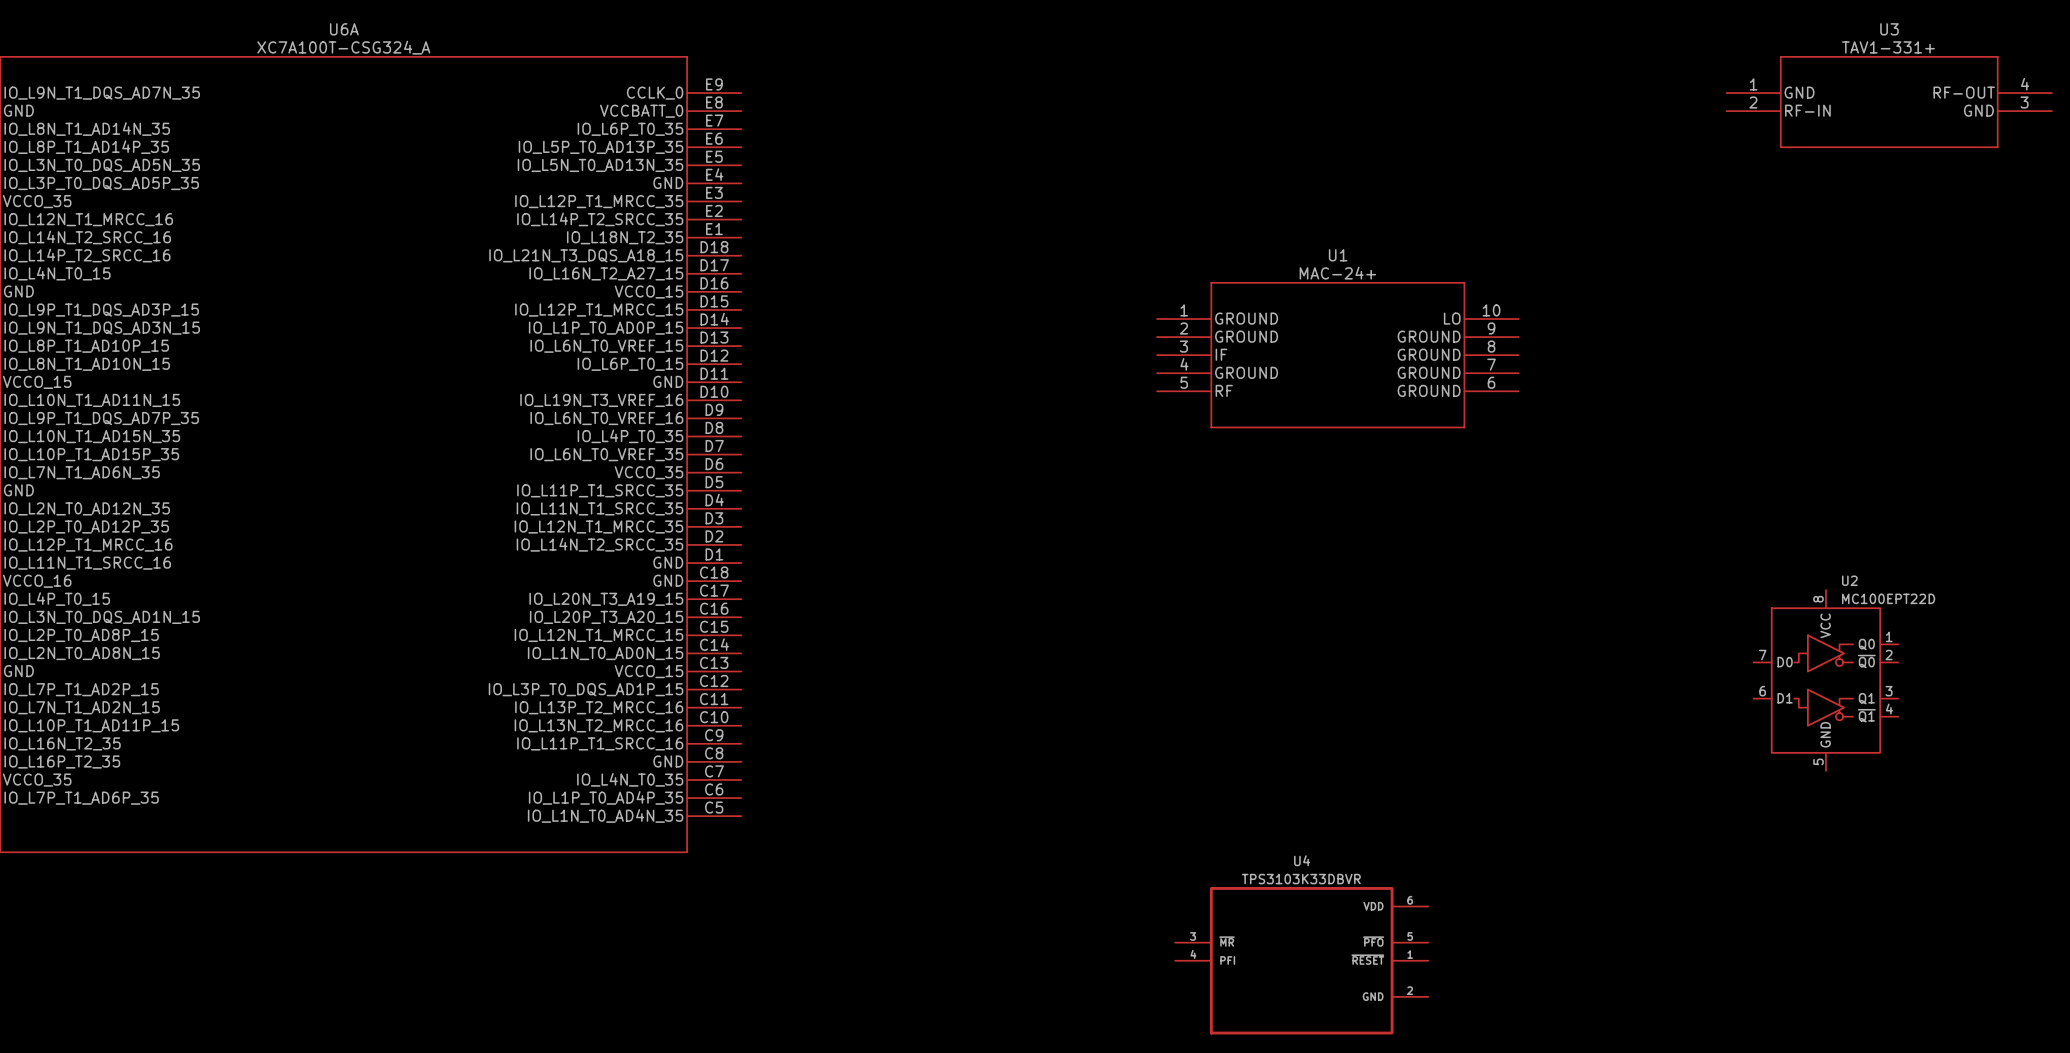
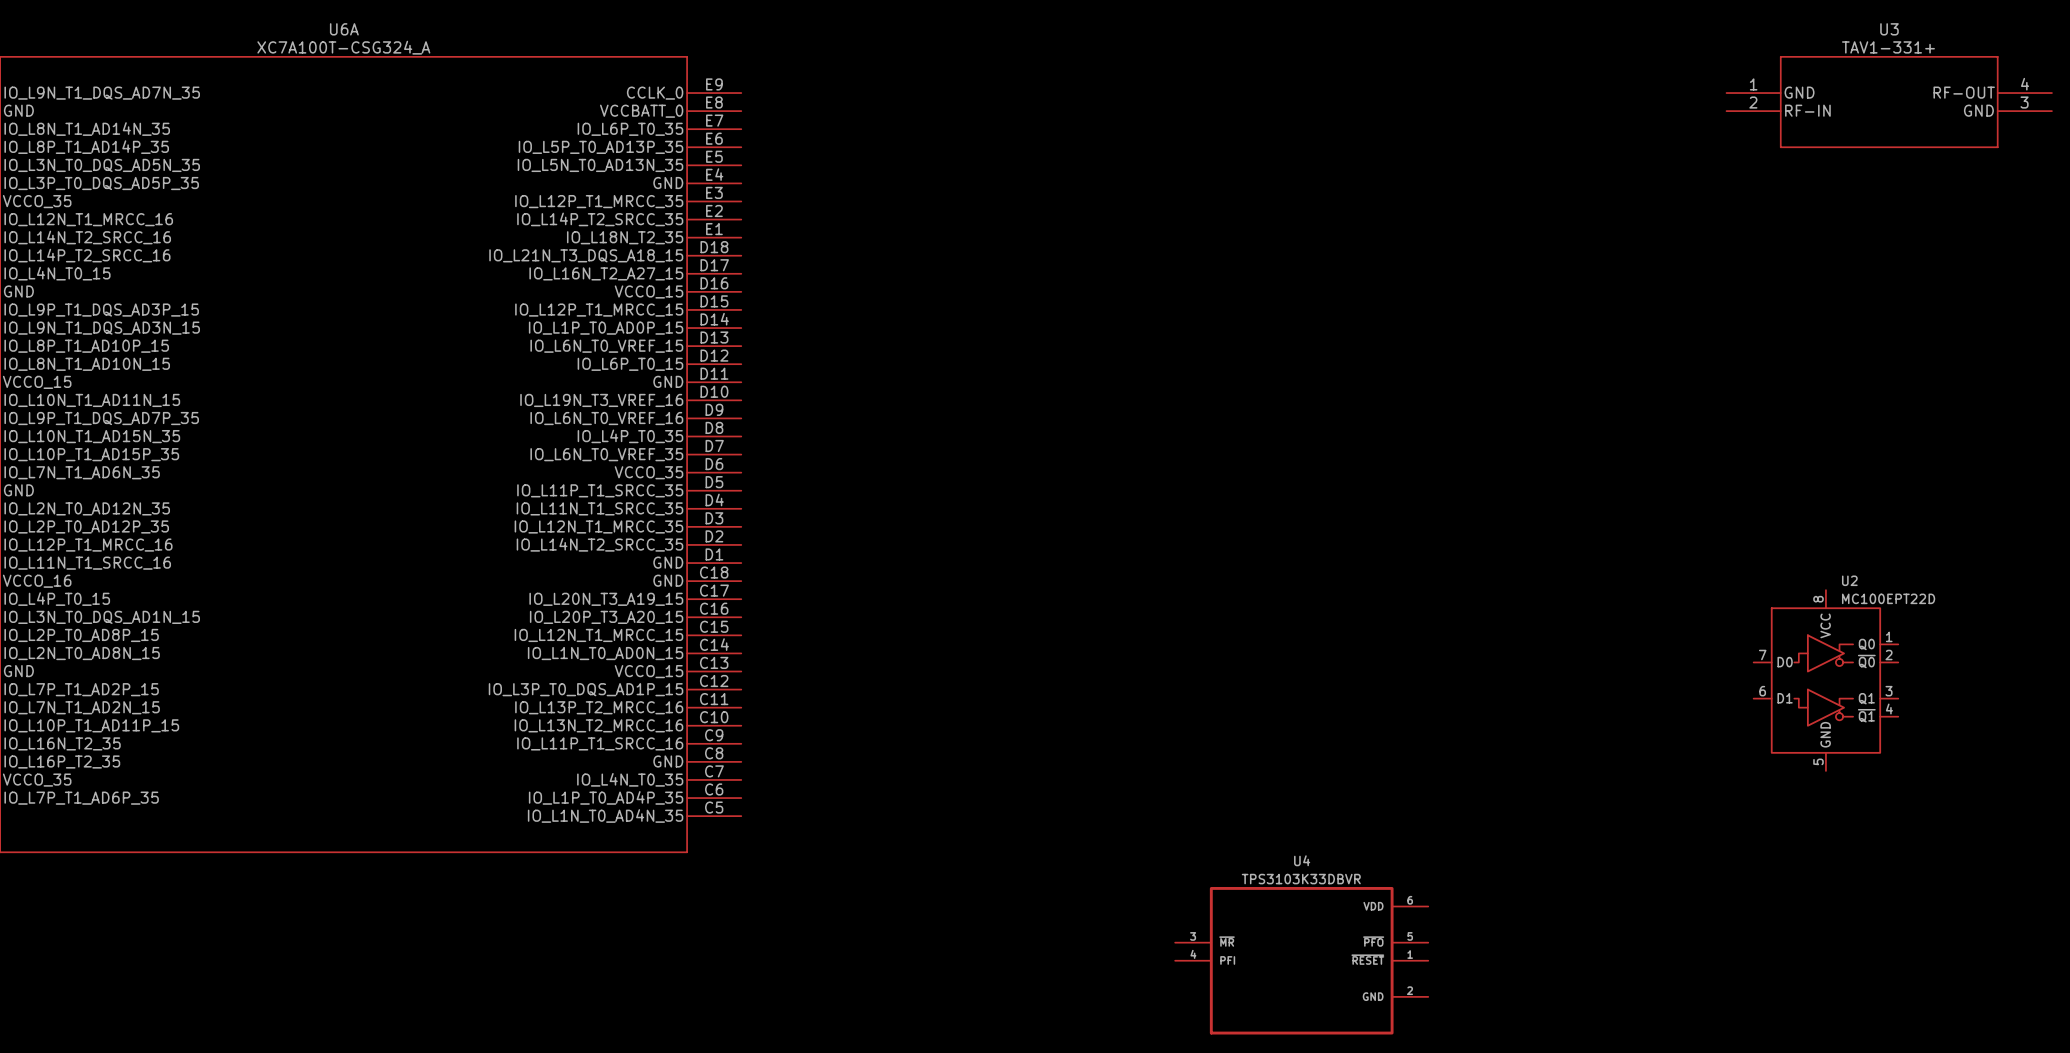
U1: MAC-24+ (1337, 355) -> none

